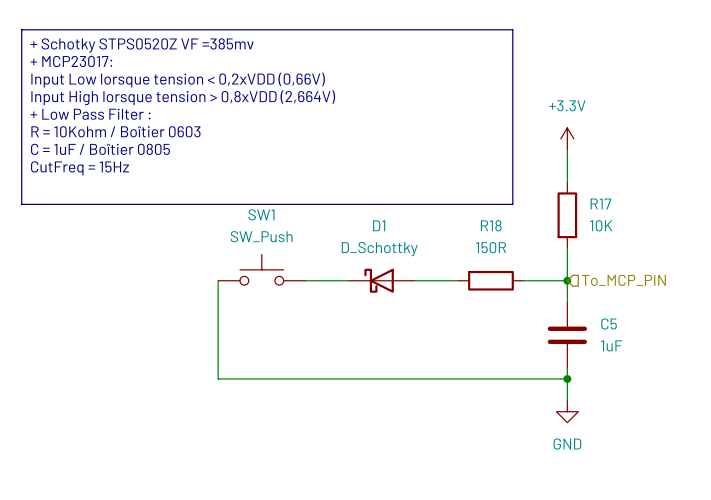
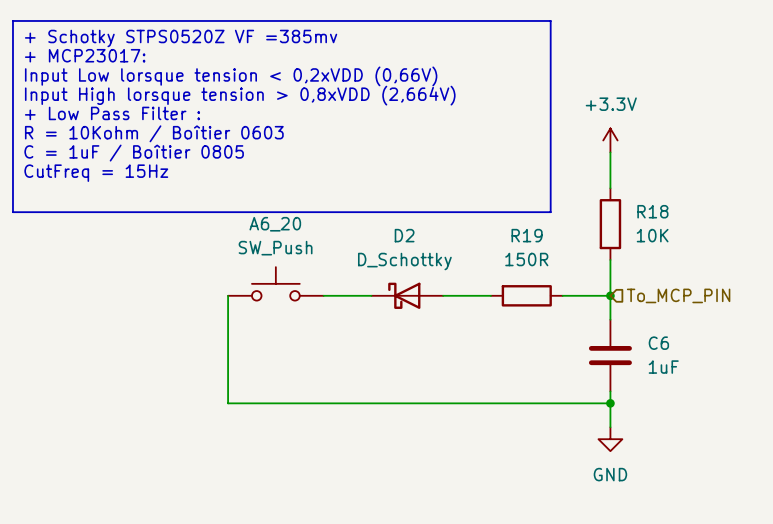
R17 name: R17 (600, 203) -> R18 (652, 211)
SW1 name: SW1 (261, 214) -> A6_20 (275, 224)
D1 name: D1 (379, 225) -> D2 (404, 235)
R18 name: R18 (491, 225) -> R19 (527, 235)
C5 name: C5 (609, 324) -> C6 (658, 343)

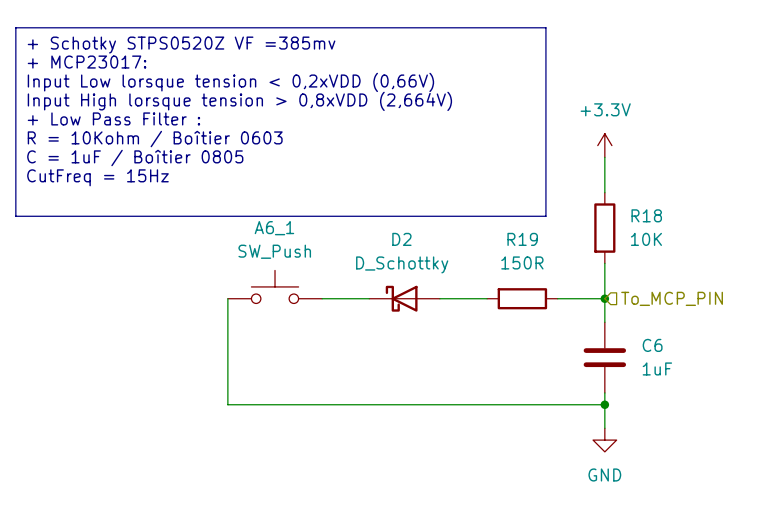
A6_20 name: A6_20 (275, 224) -> A6_1 (274, 228)

